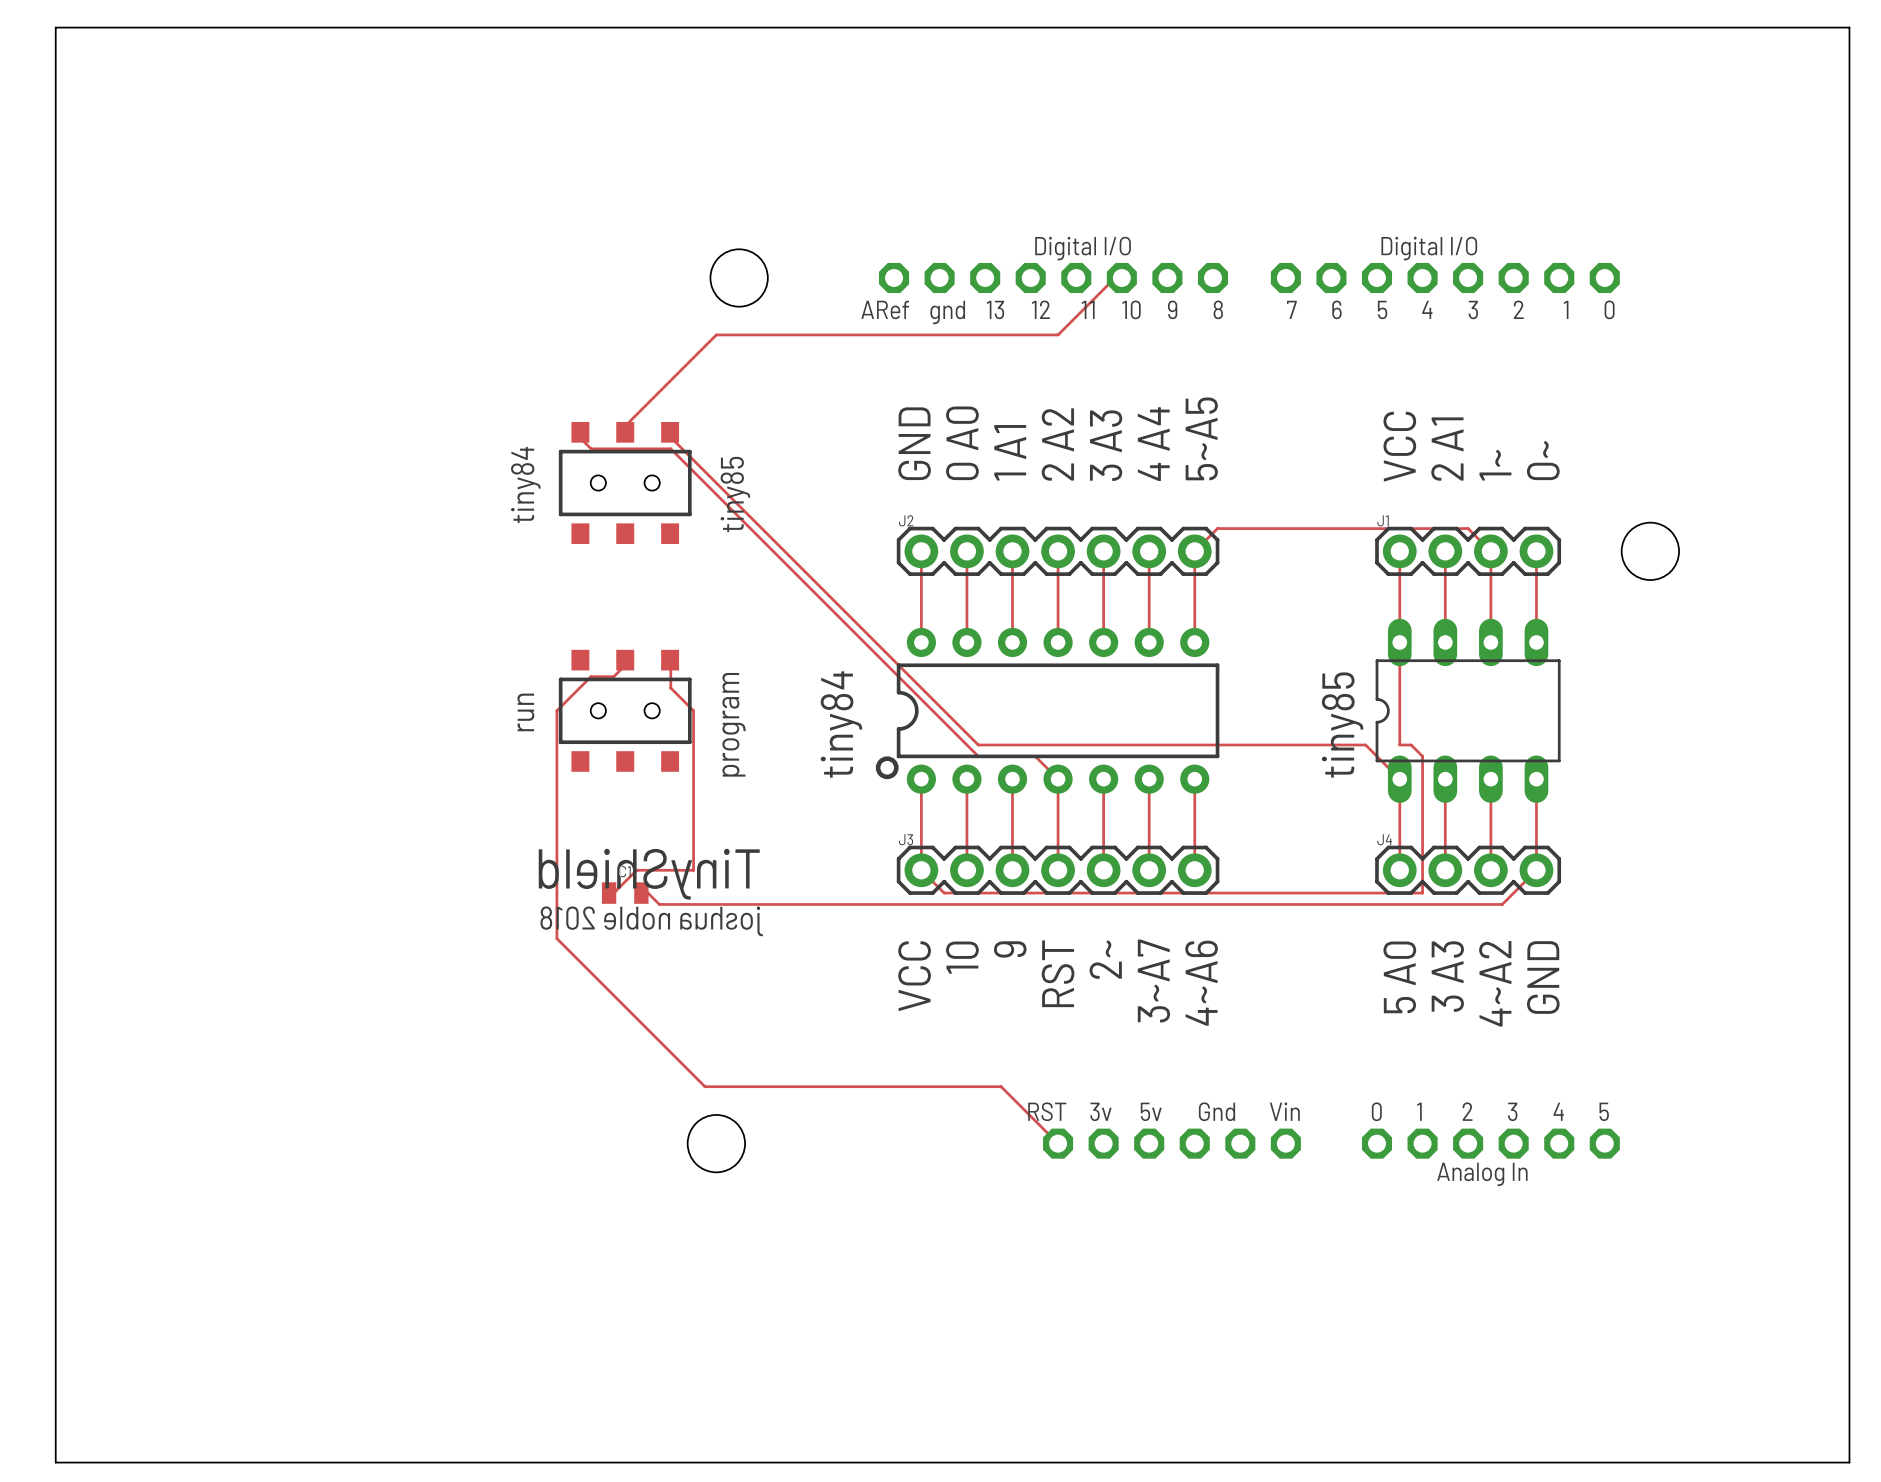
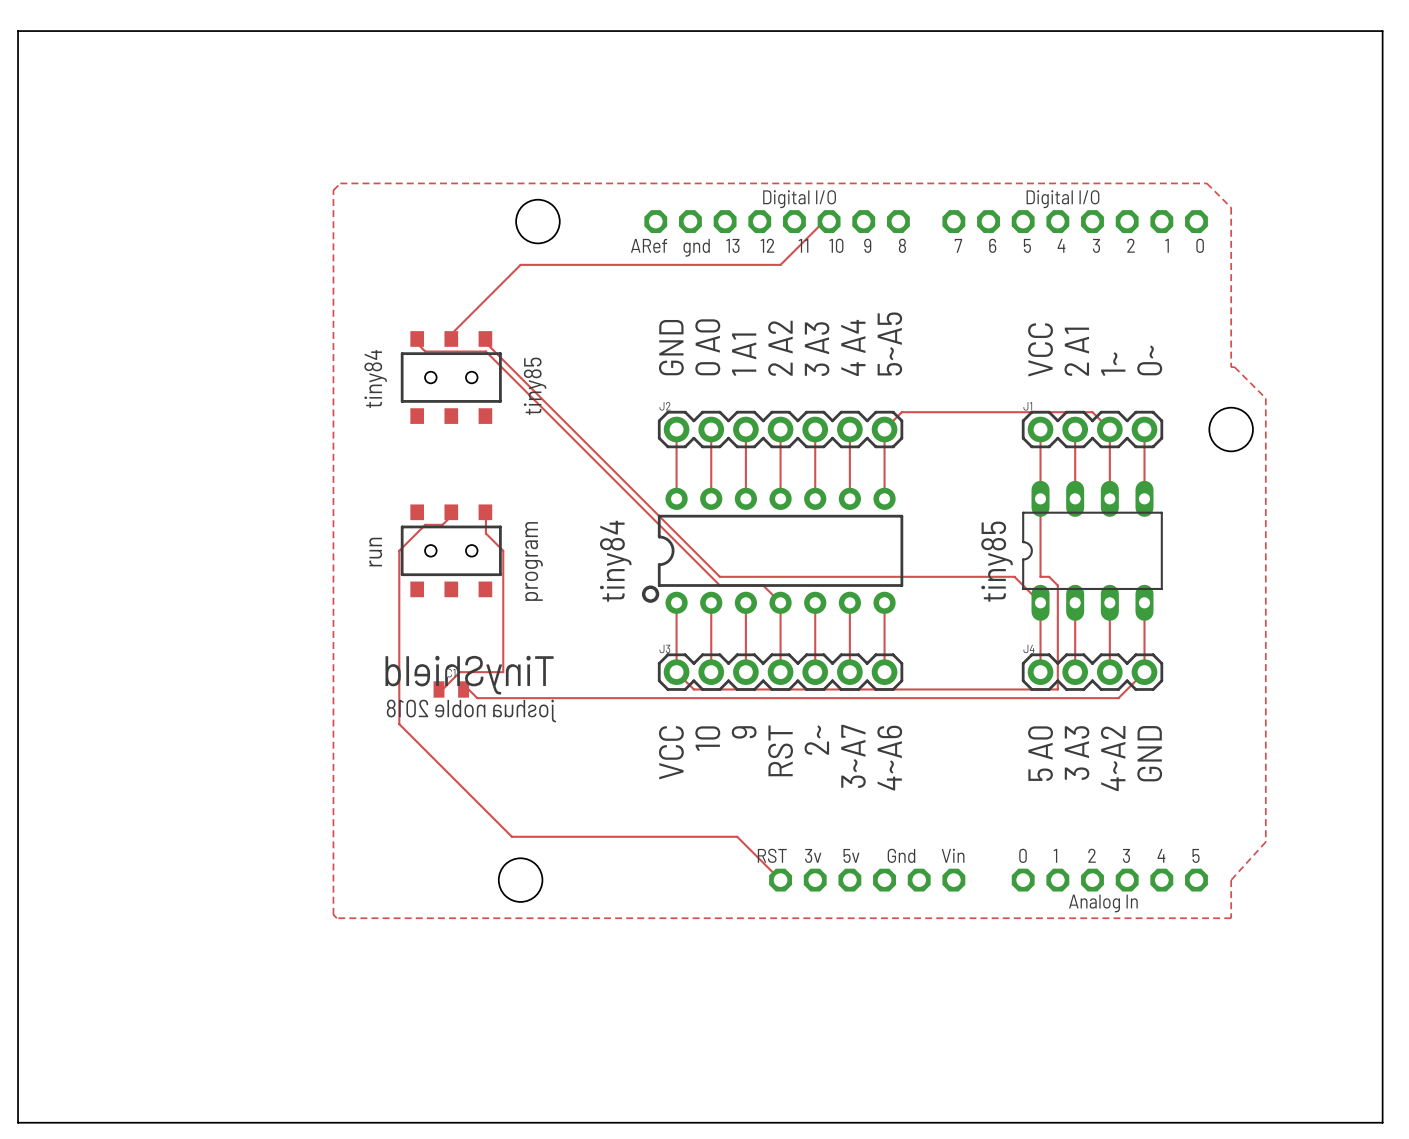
zone outline: none -> (340, 183) (1206, 183) (1231, 207) (1231, 367) (1234, 367) (1265, 398) (1265, 841) (1231, 880) (1231, 918) (336, 918) (333, 914) (333, 190) (340, 183)

